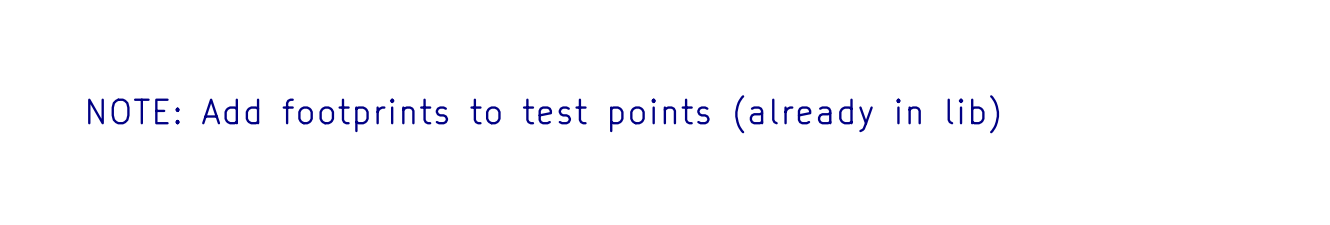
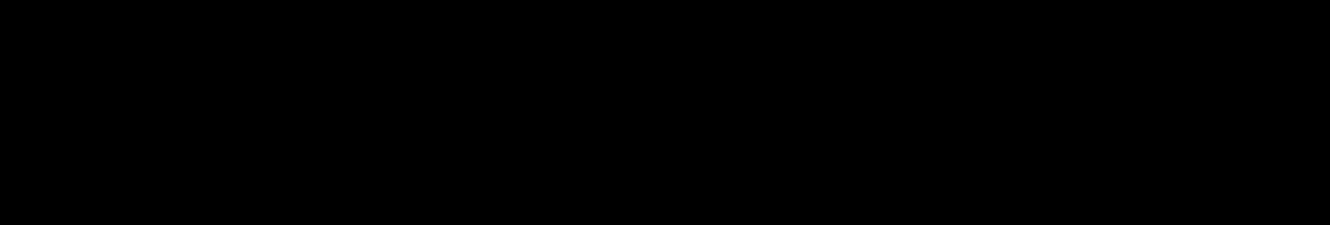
text: NOTE: Add footprints to test points (already in lib) (543, 114) -> none

